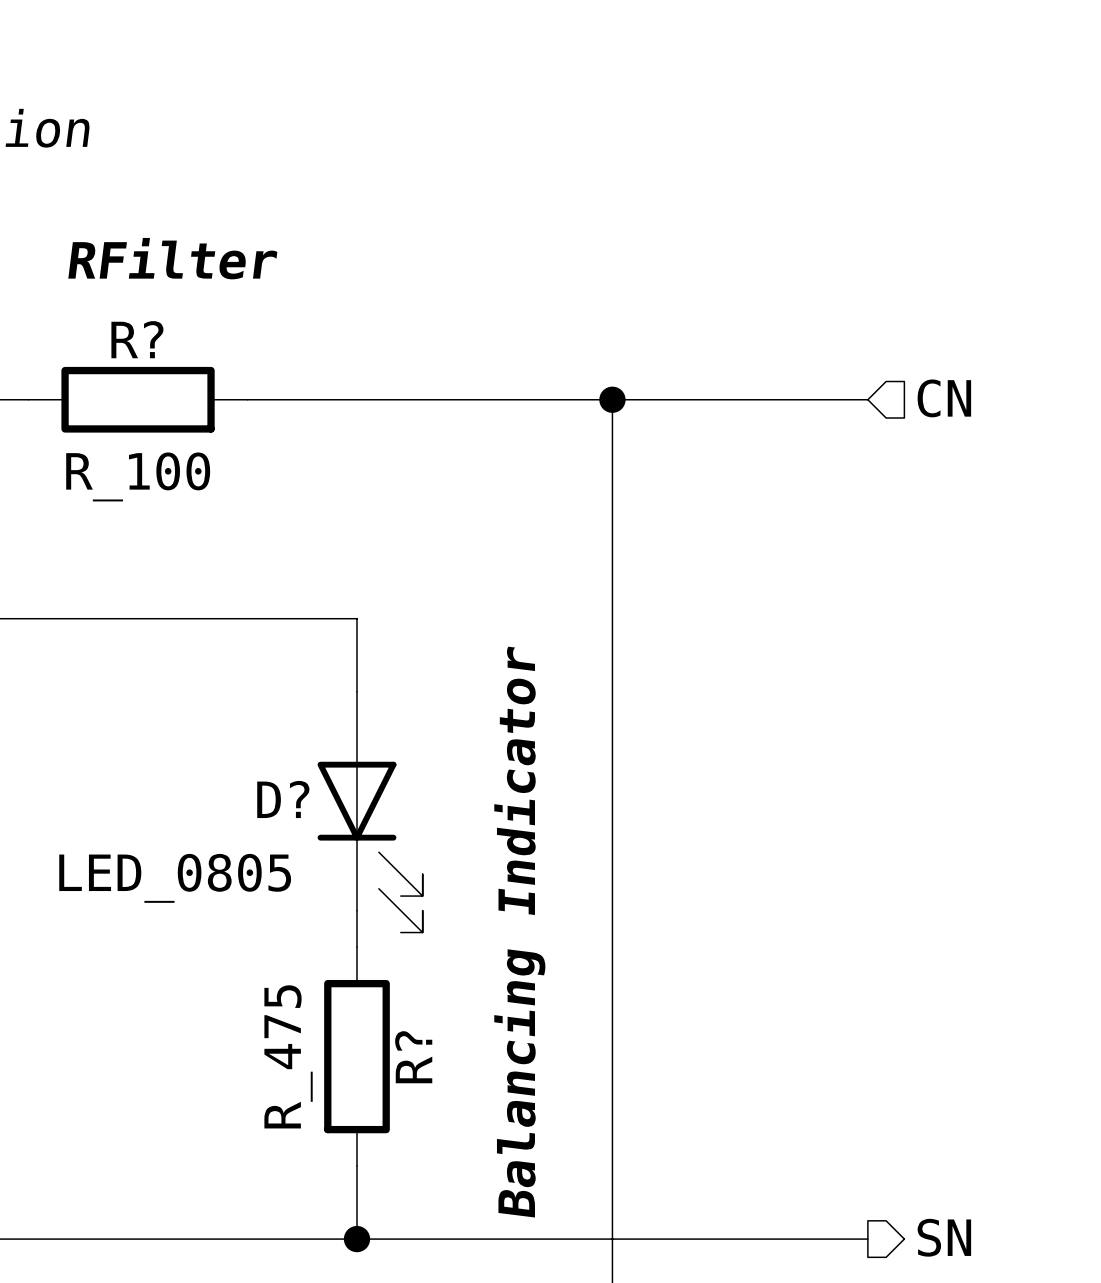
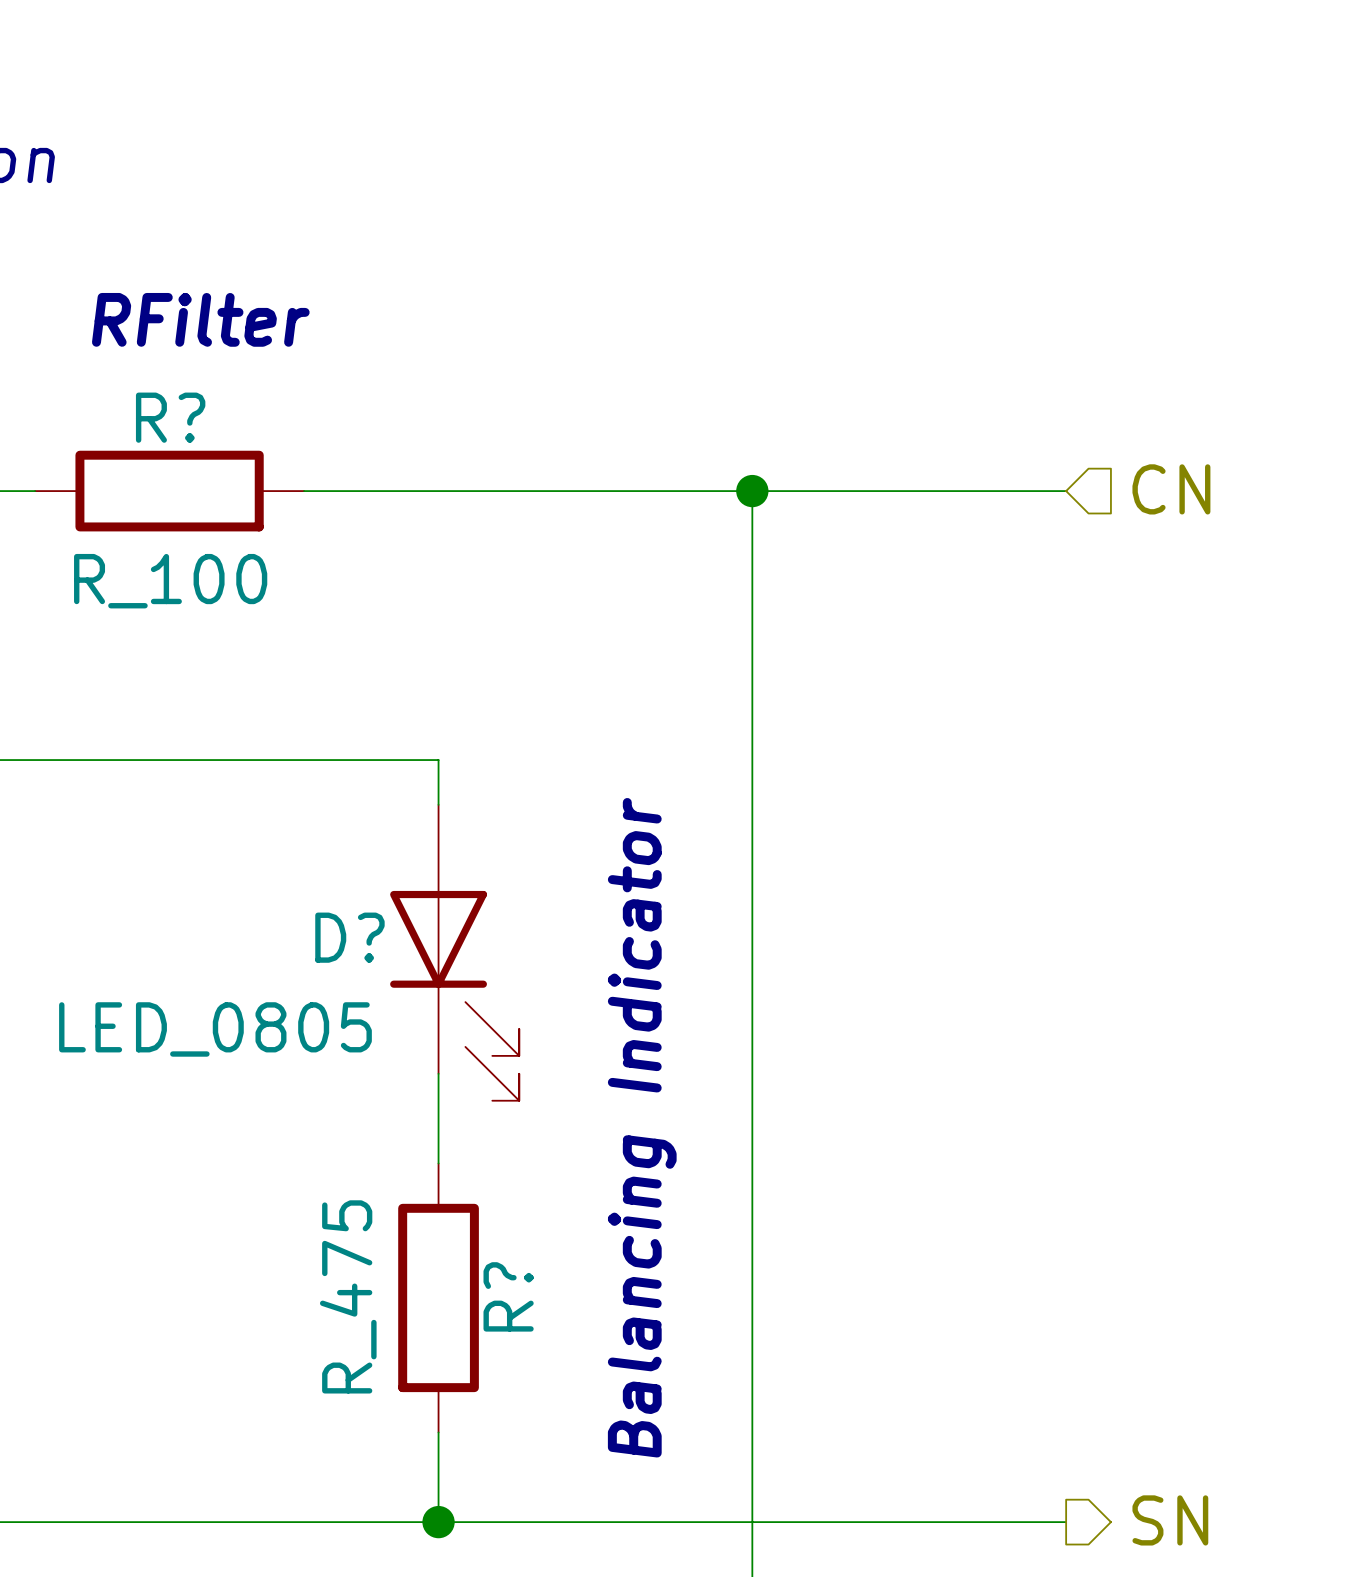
D? position: (370, 812) -> (454, 952)

